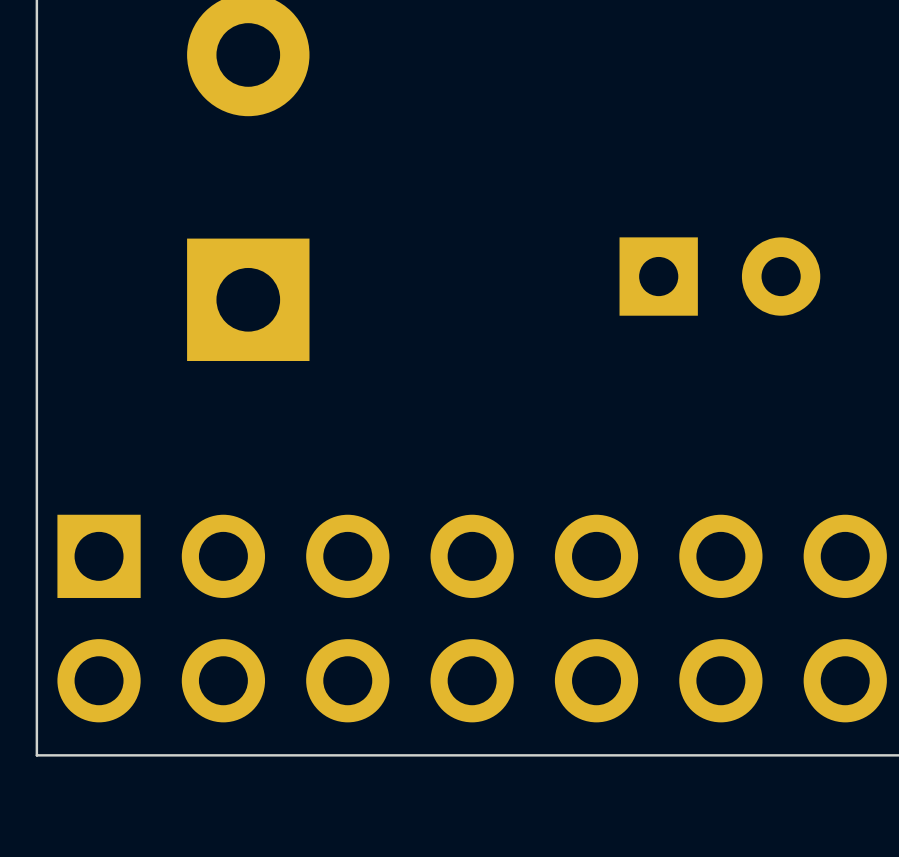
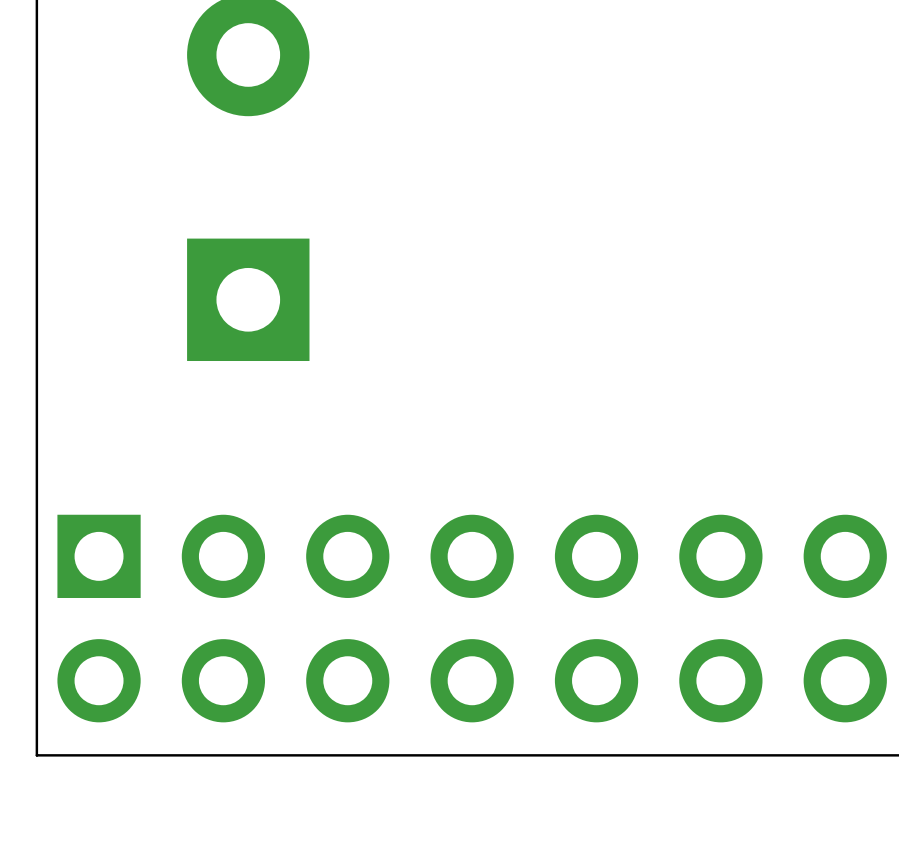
part: (719, 276) -> none

